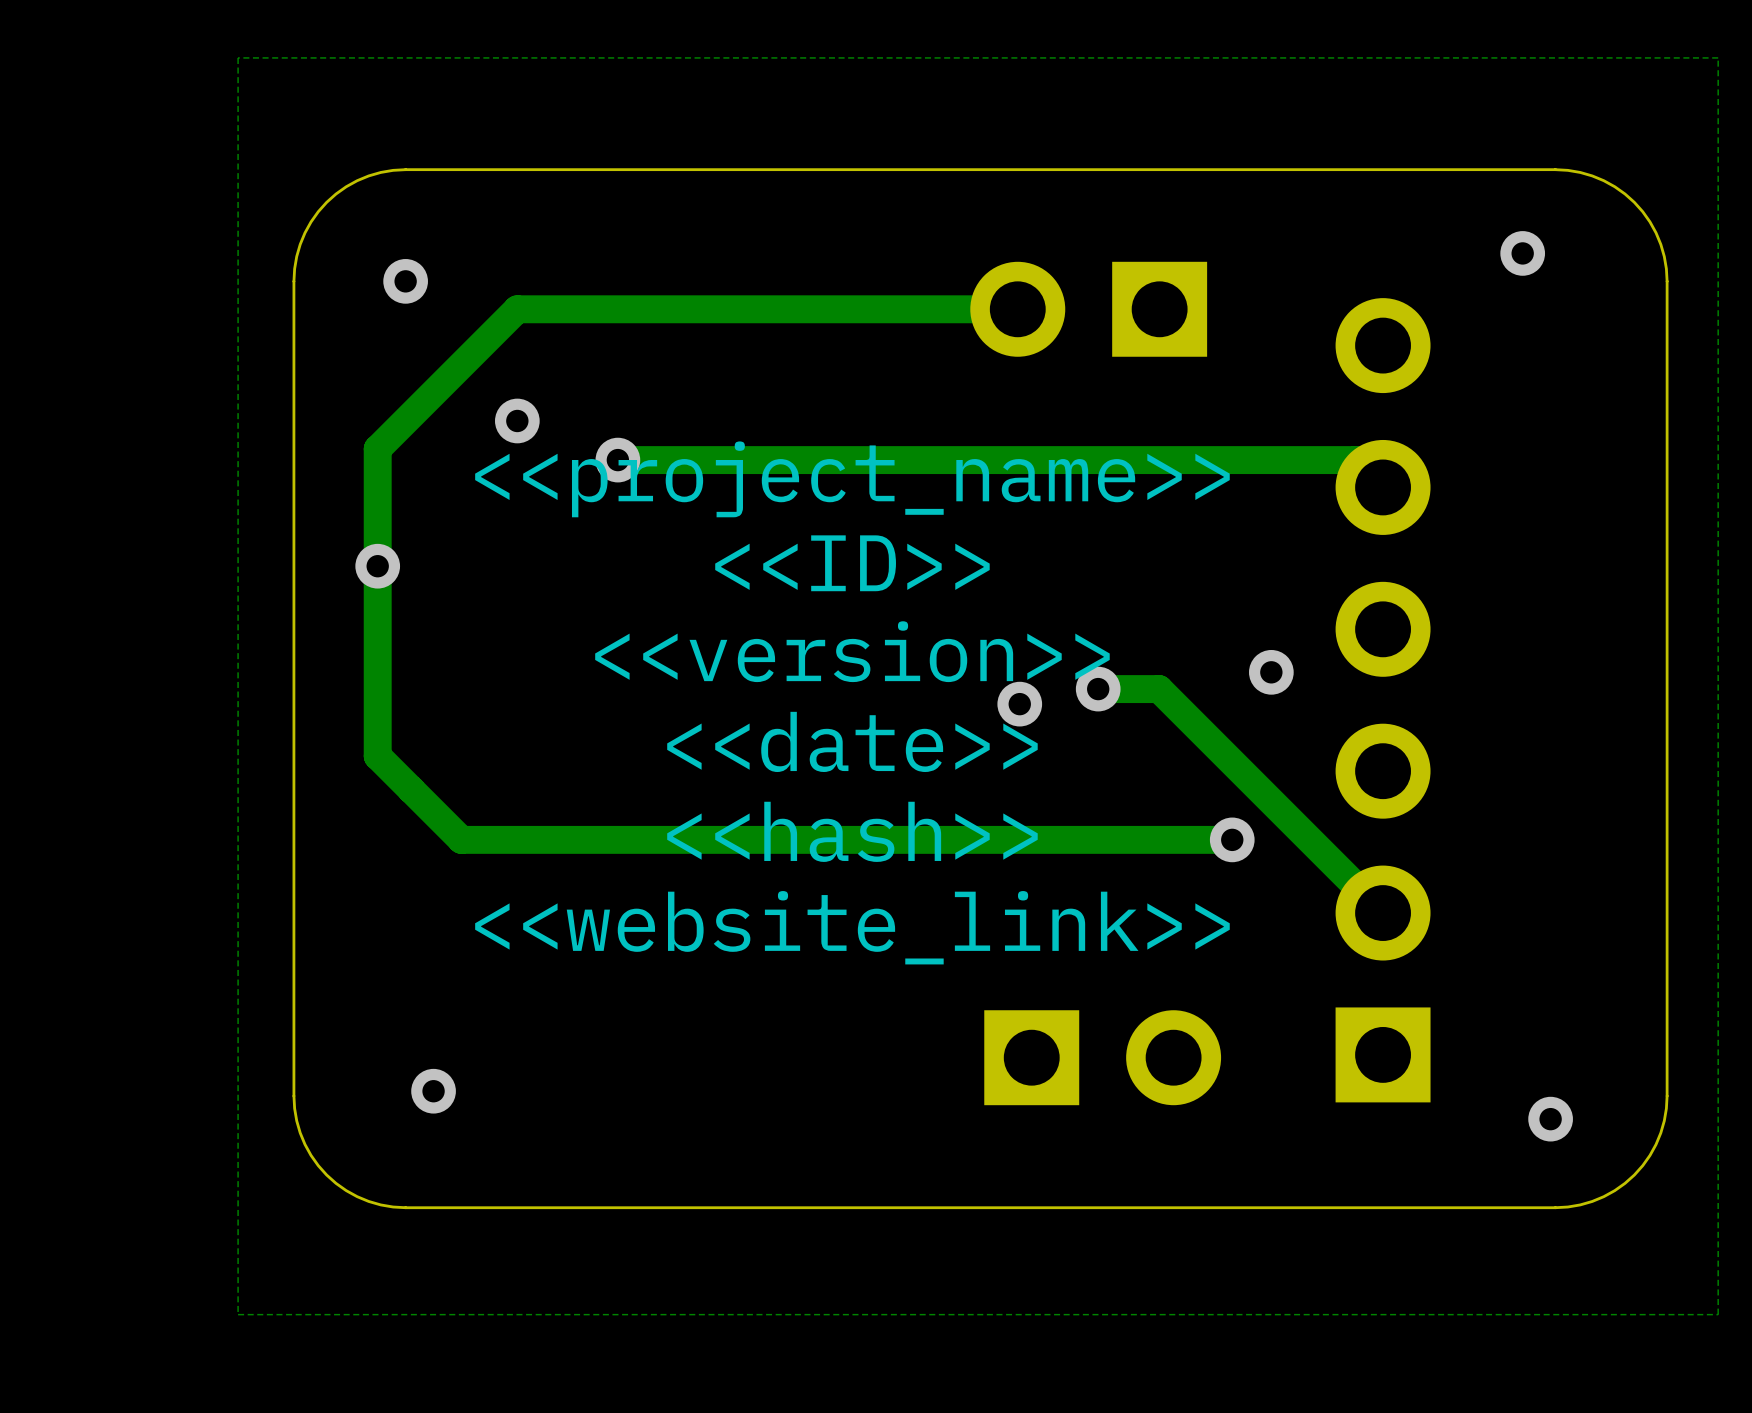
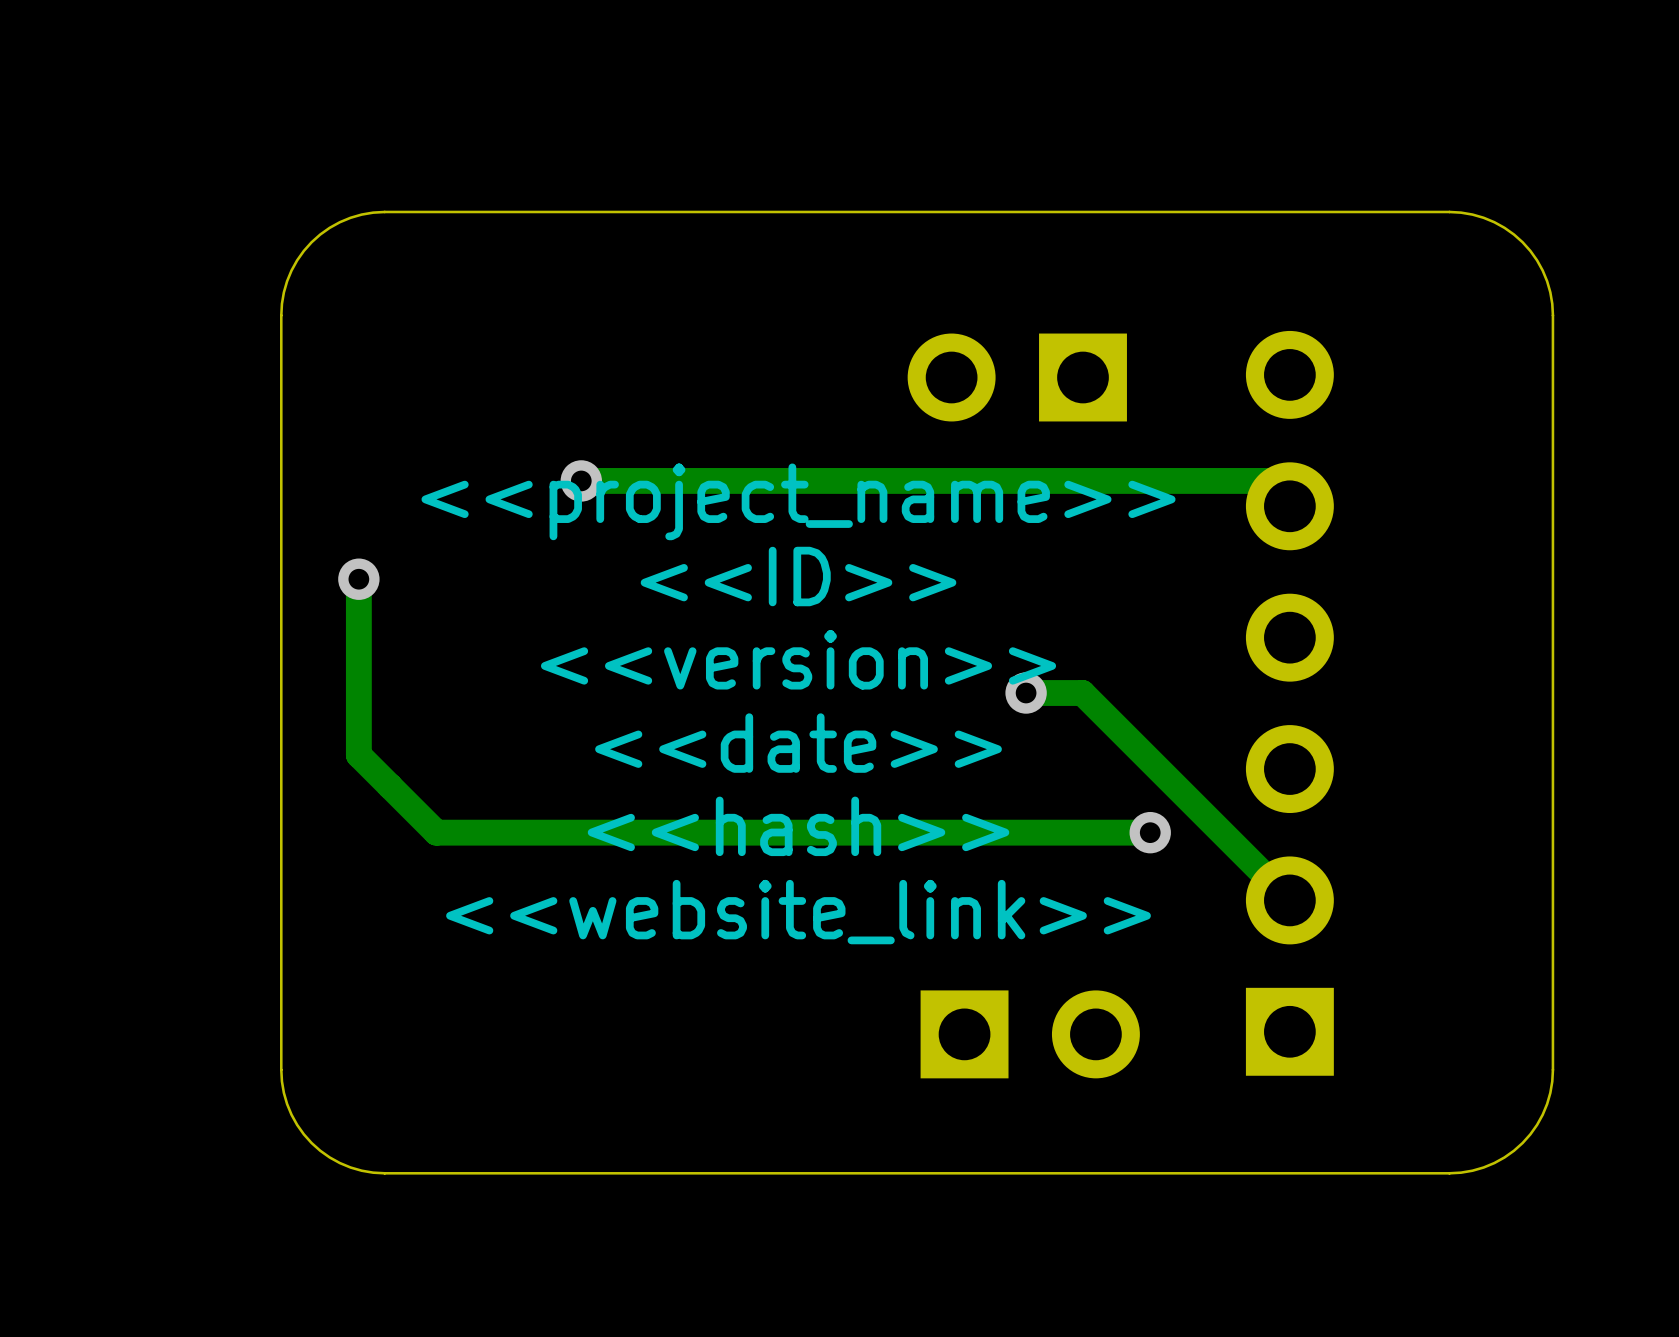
zone outline: (1718, 57) (1718, 1314) (238, 1314) (238, 57) (1718, 57) -> none
via: (1522, 253) -> none
via: (405, 281) -> none
track: (1017, 309) (517, 309) (377, 448) (377, 566) -> none
part position: (1088, 309) -> (1017, 377)
via: (517, 420) -> none
via: (1271, 672) -> none
via: (1019, 704) -> none
via: (433, 1091) -> none
via: (1550, 1119) -> none

